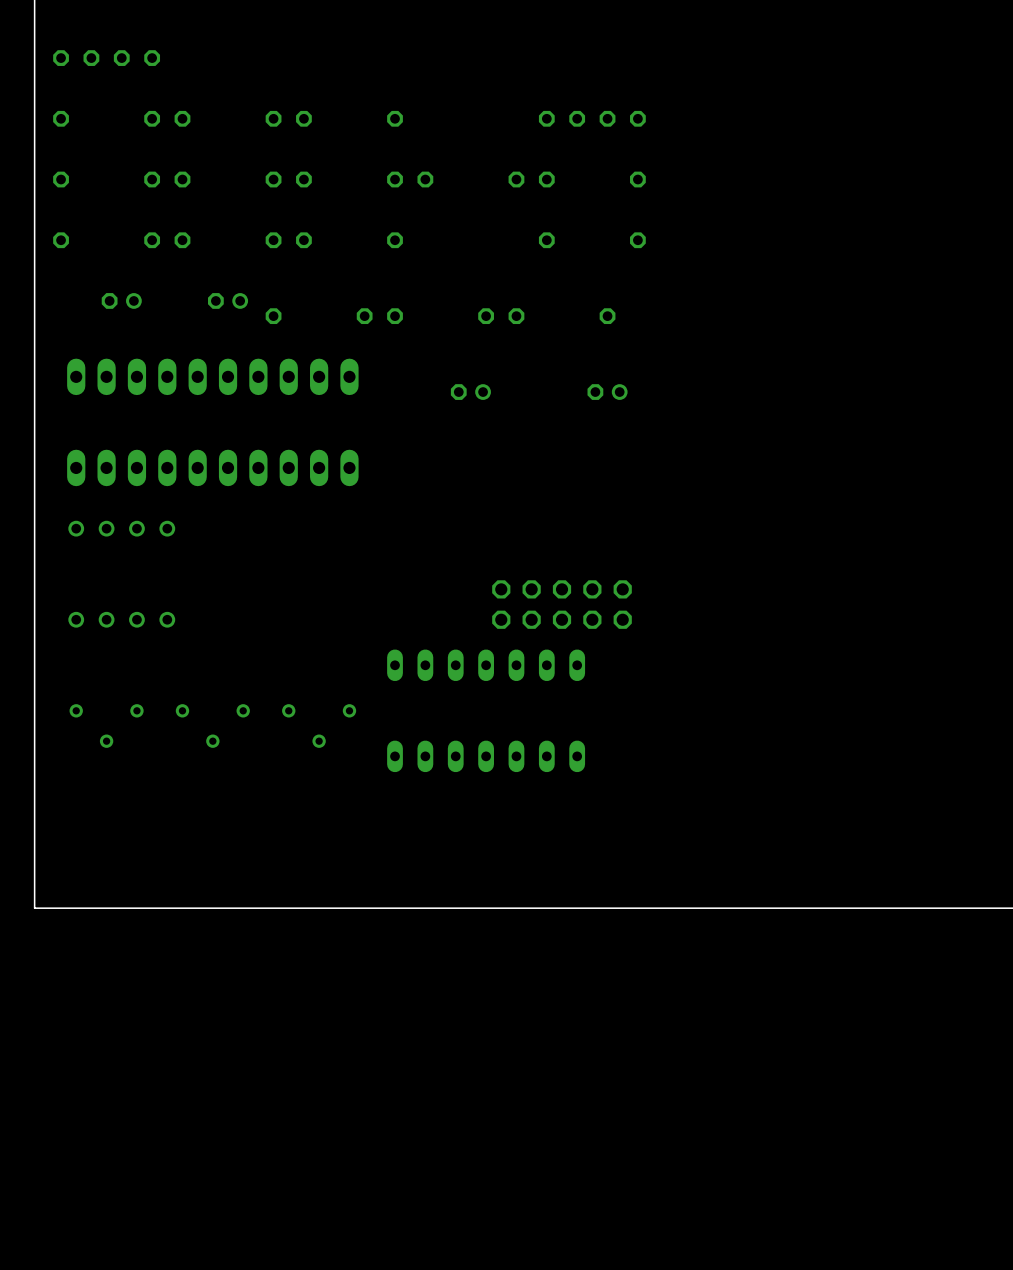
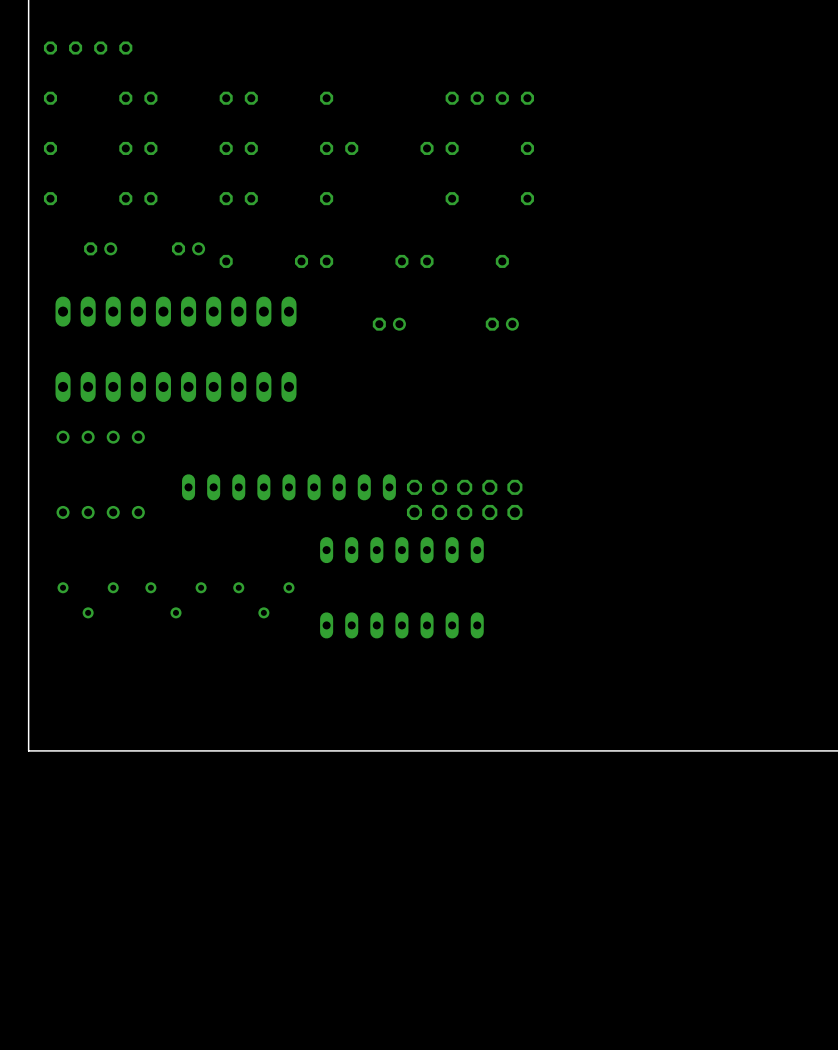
part: none -> (213, 487)
part: none -> (288, 487)
part: none -> (364, 487)

